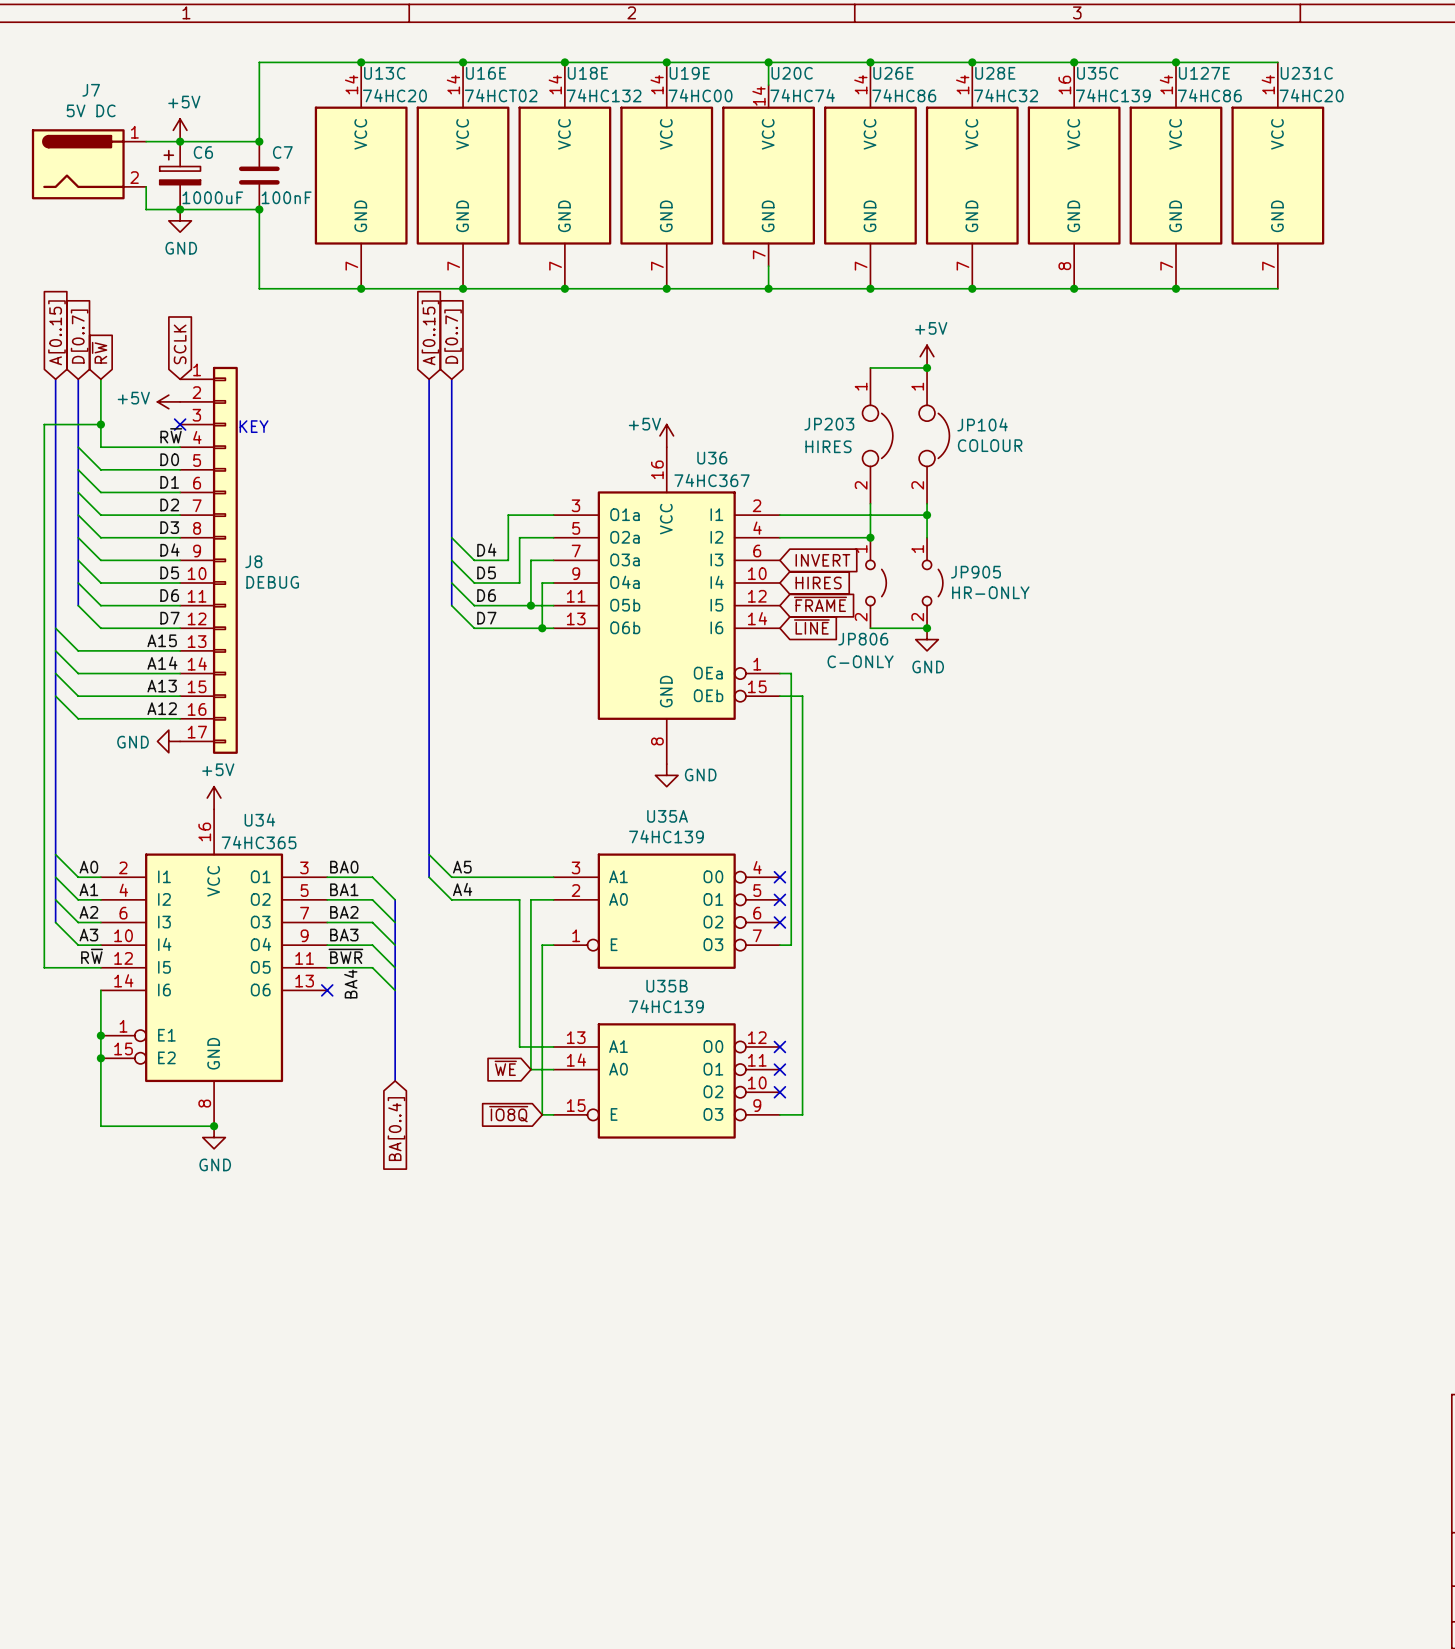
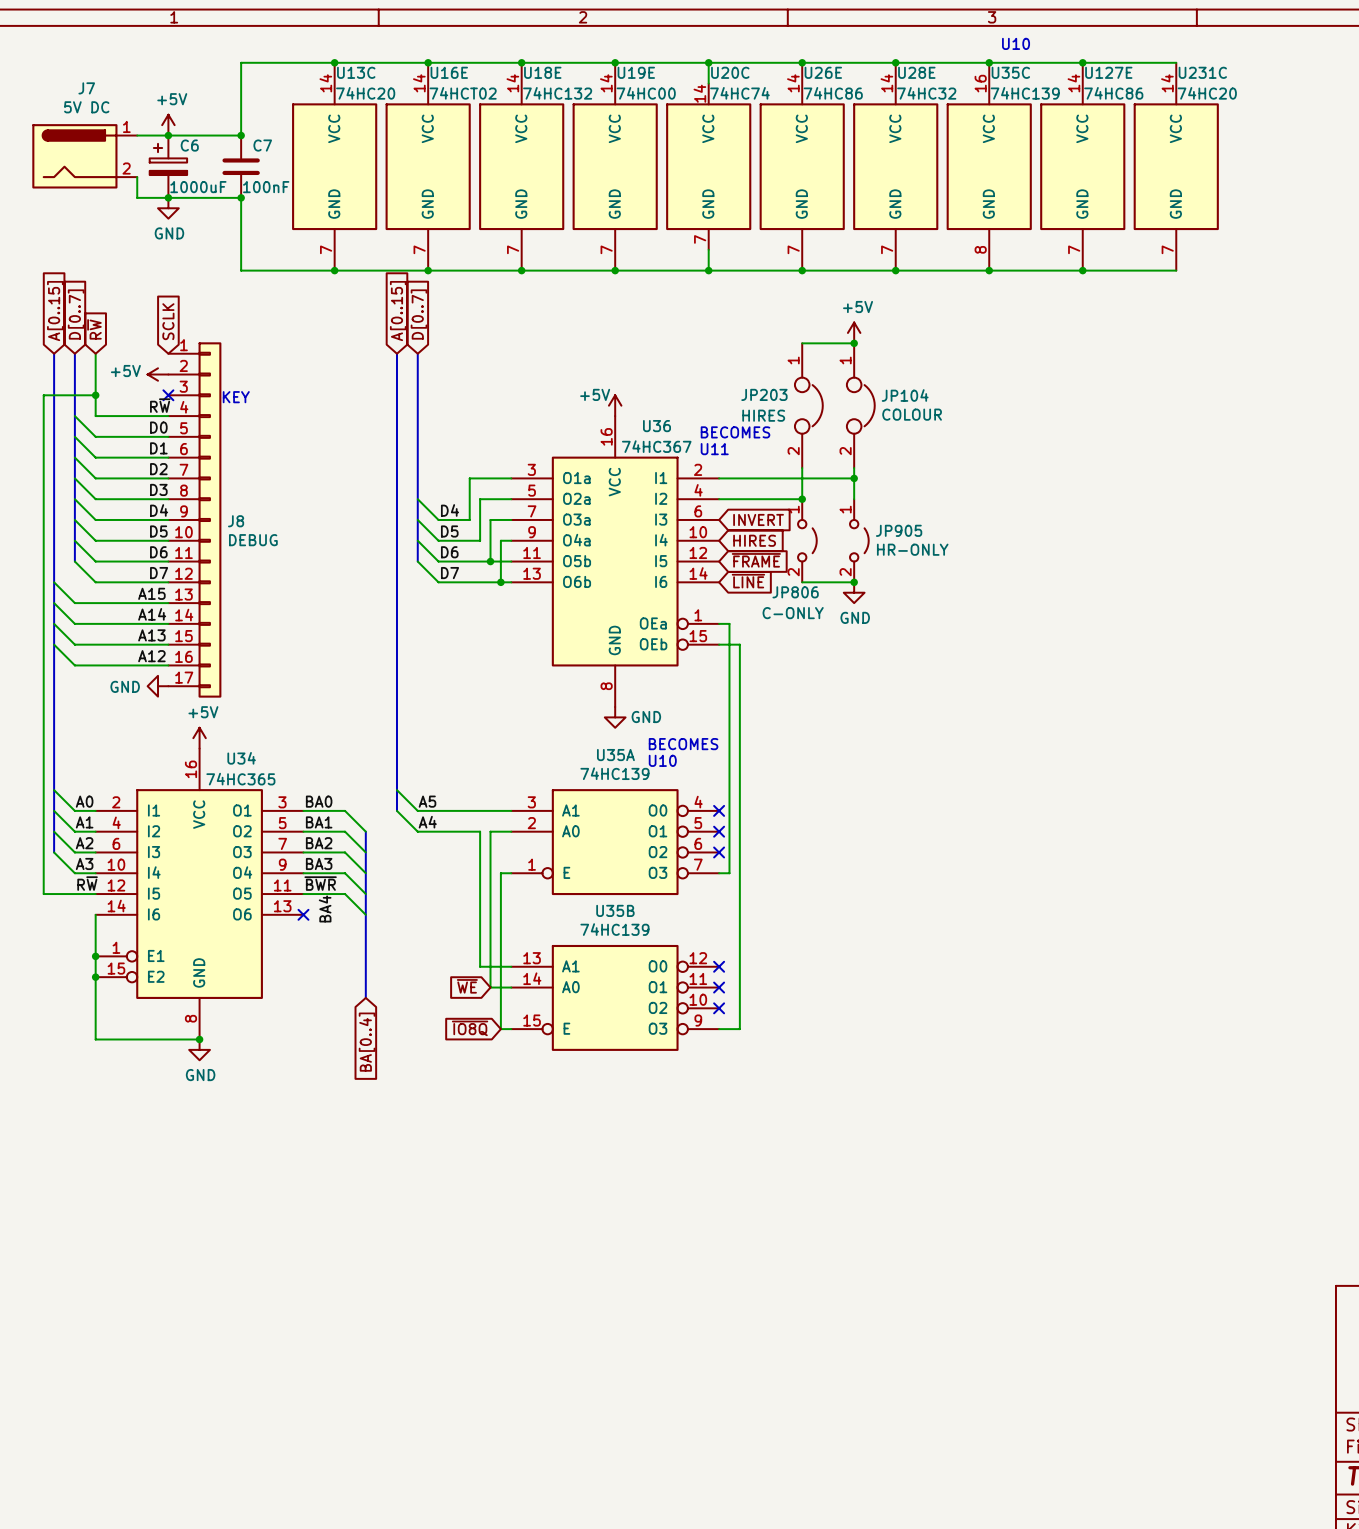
text: none -> U10 (1016, 43)
text: none -> BECOMES (735, 432)
text: none -> U11 (714, 449)
text: none -> BECOMES (683, 744)
text: none -> U10 (662, 760)

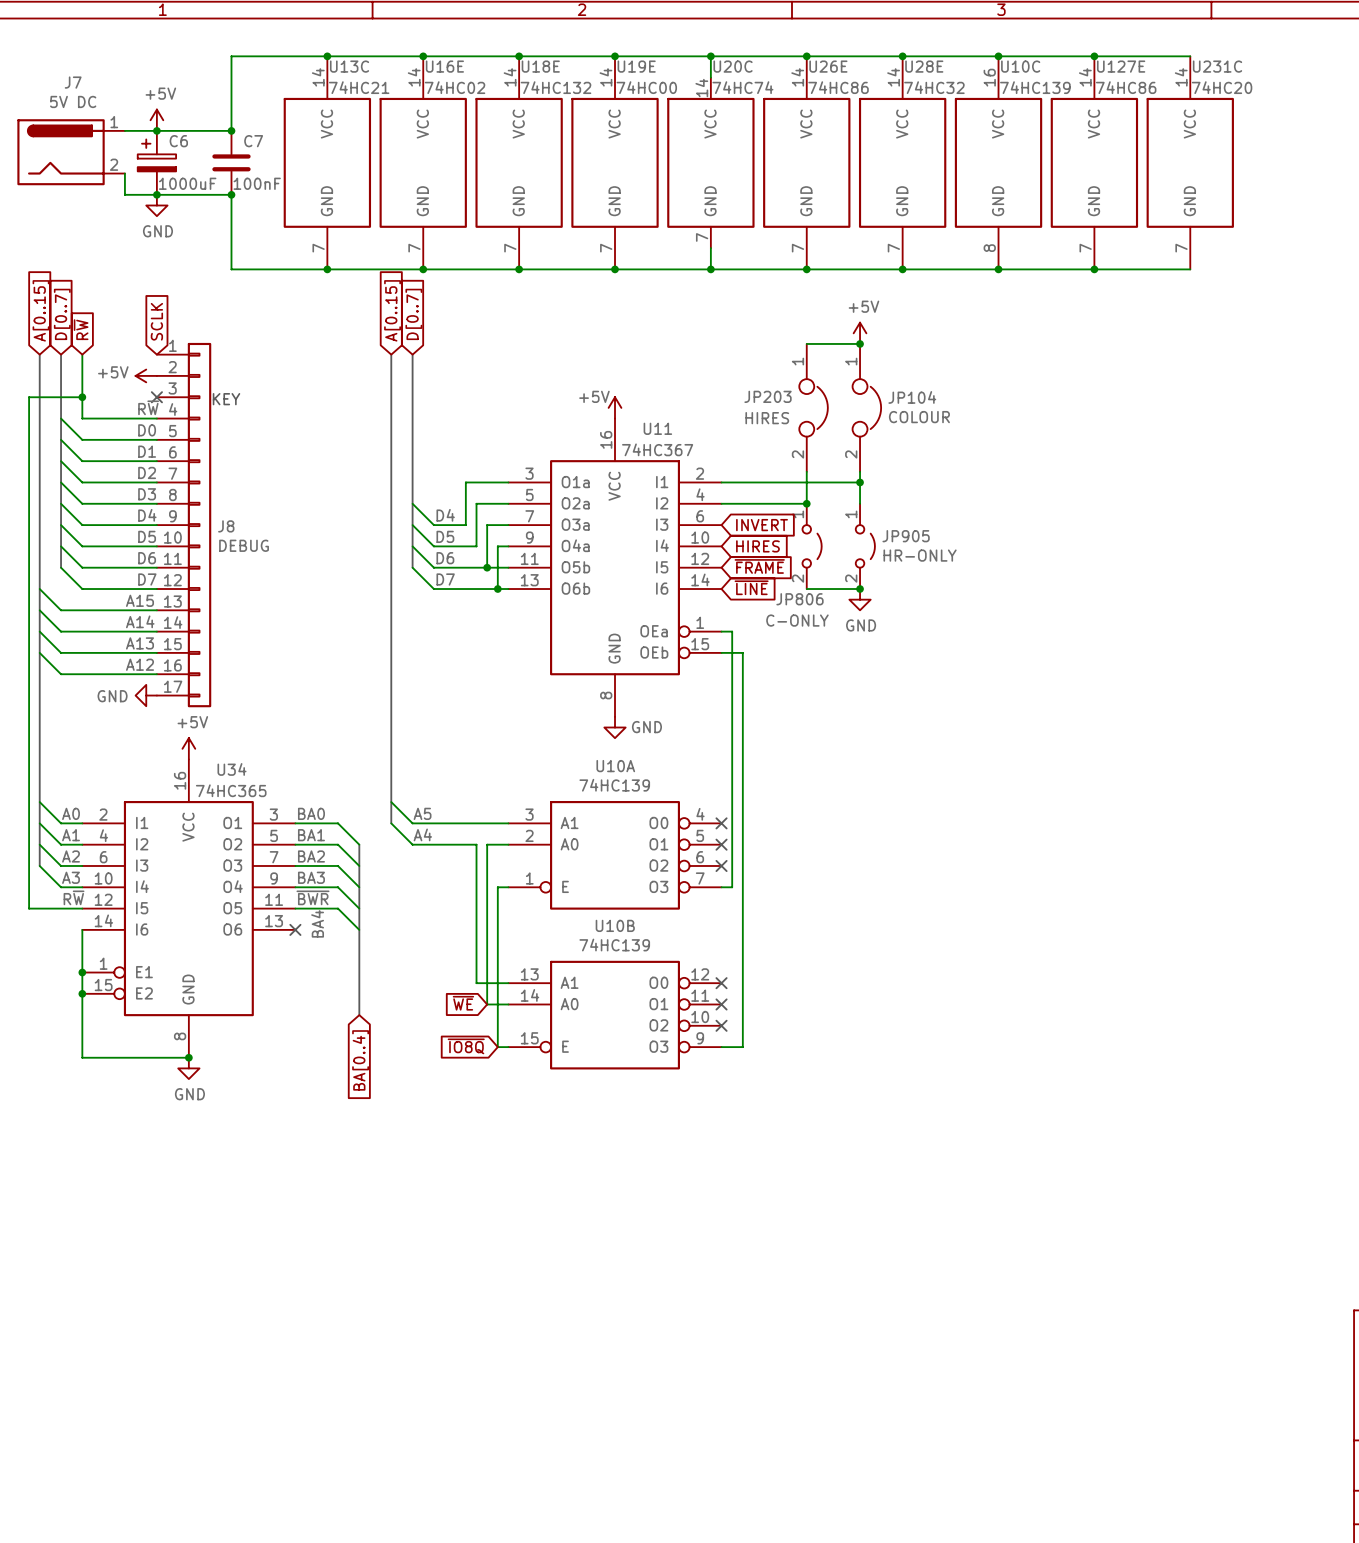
text: U10 (1016, 43) -> none
U35C name: U35C (1010, 72) -> U10C (1020, 66)
U13C value: 74HC20 (365, 93) -> 74HC21 (359, 87)
U16E value: 74HCT02 (463, 93) -> 74HC02 (455, 87)
U36 name: U36 (657, 426) -> U11 (657, 428)
text: BECOMES (735, 432) -> none
text: U11 (714, 449) -> none
text: BECOMES (683, 744) -> none
U35A name: U35A (615, 755) -> U10A (615, 766)
text: U10 (662, 760) -> none
U35B name: U35B (615, 910) -> U10B (615, 925)

